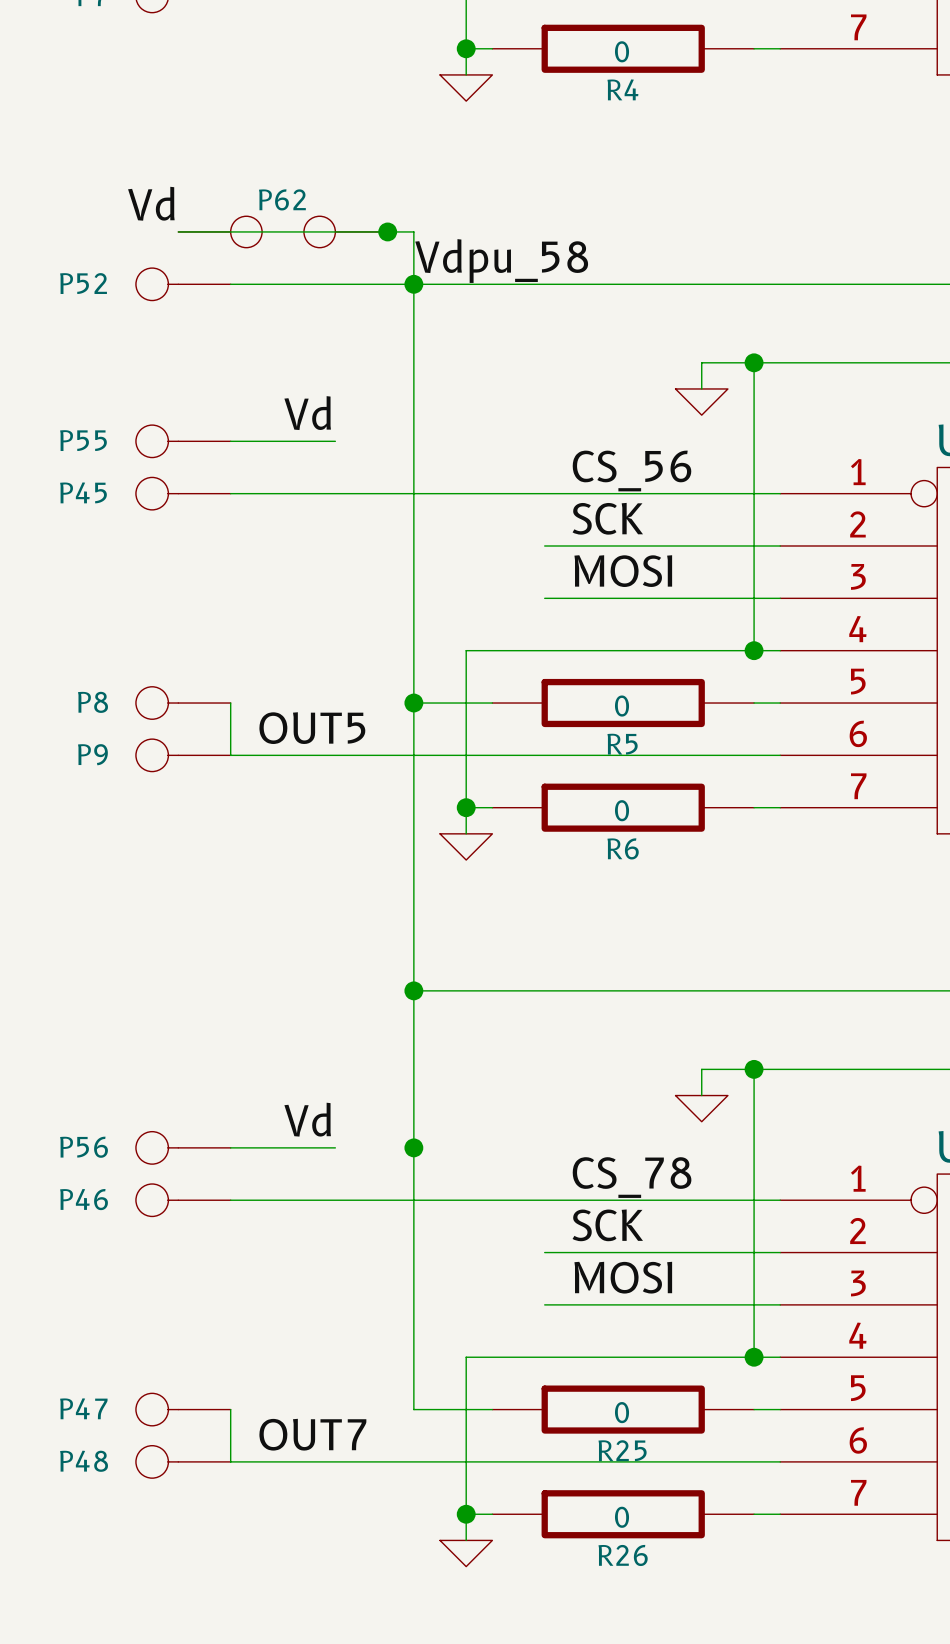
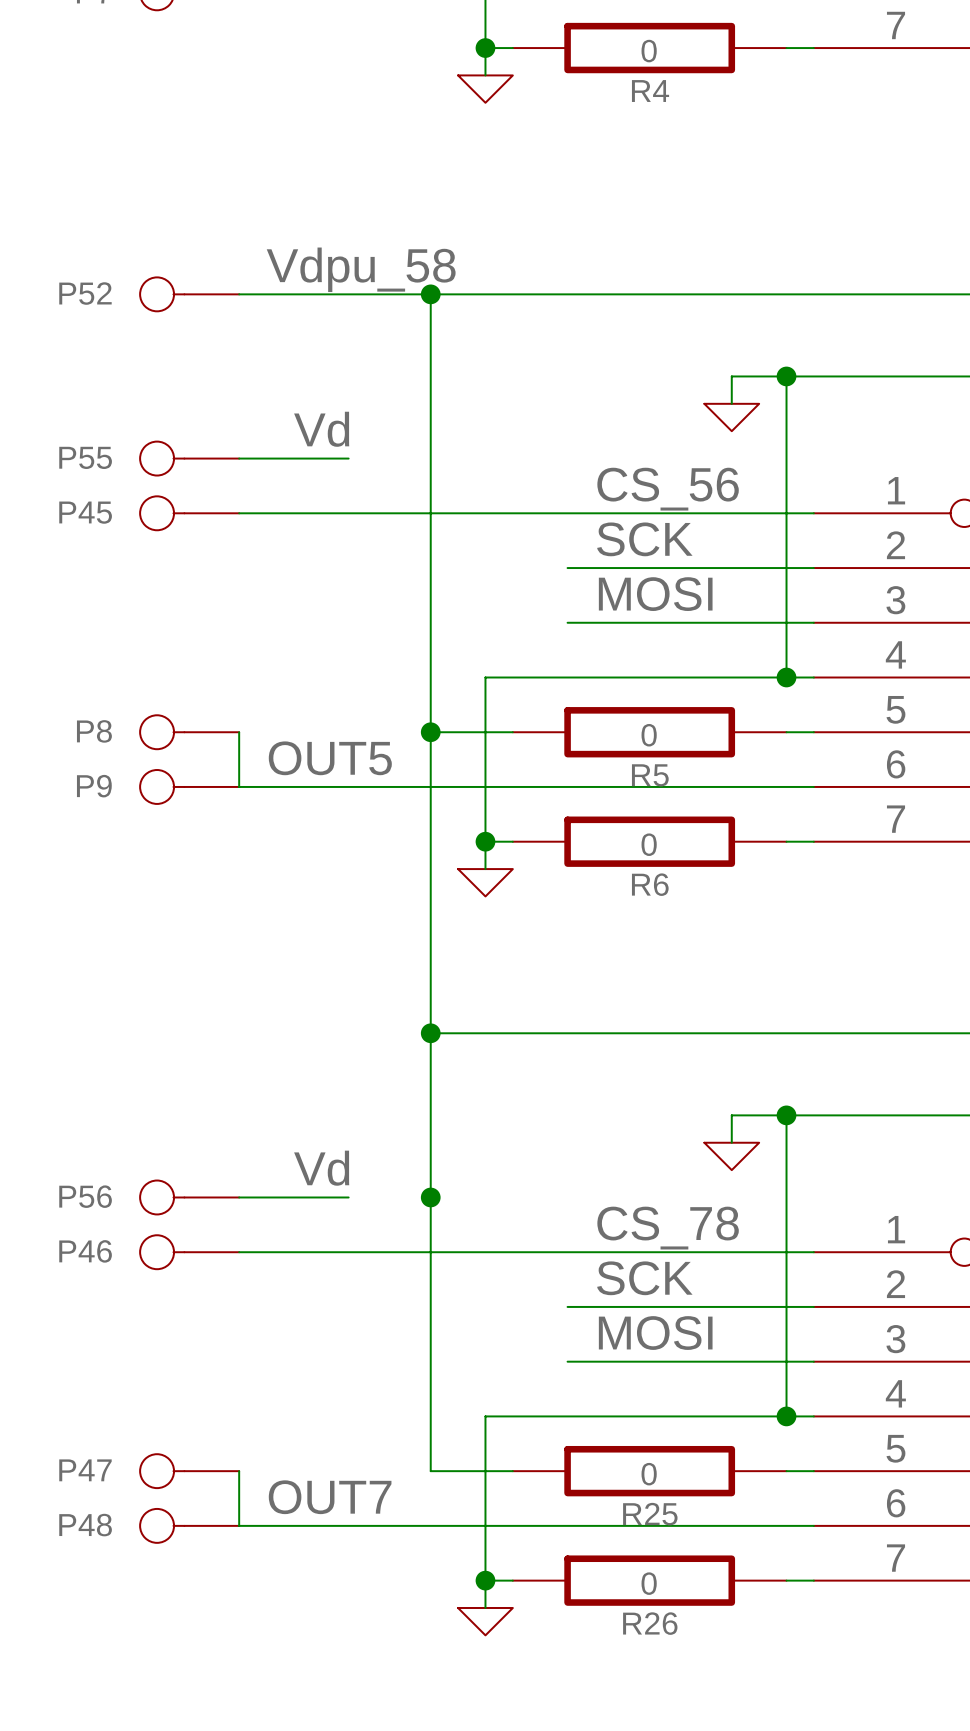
label: Vd (151, 203) -> none
wire: (178, 231) (413, 231) (413, 284) -> none
P62: (283, 231) -> none
junction: (387, 231) -> none
label position: Vdpu_58 (501, 261) -> Vdpu_58 (361, 269)

